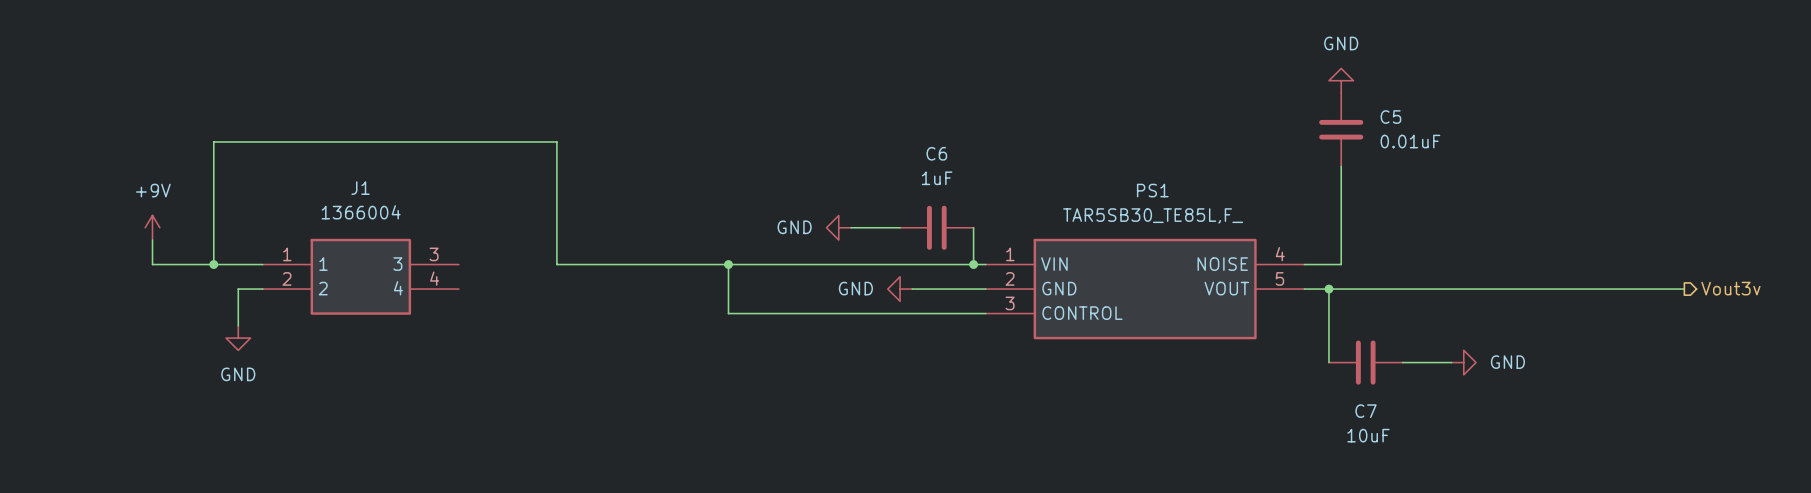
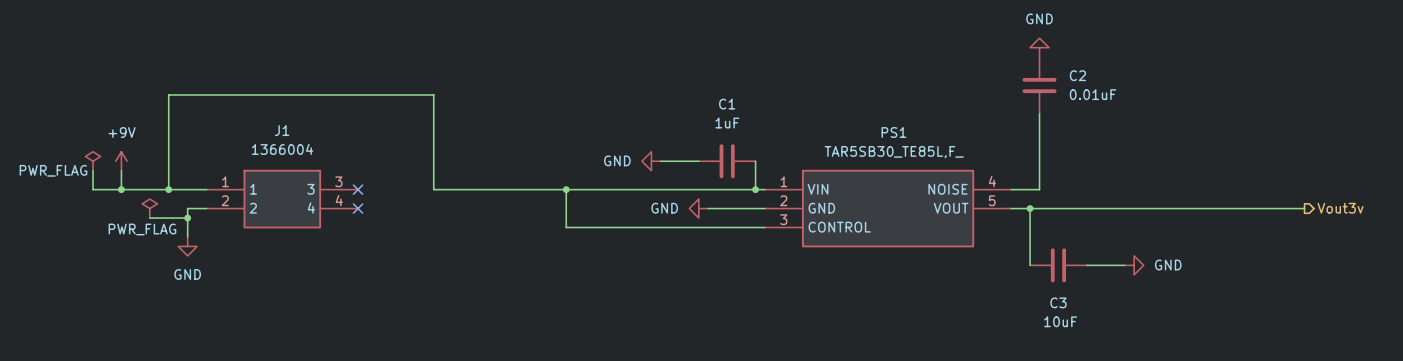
C5 name: C5 (1390, 117) -> C2 (1077, 75)
C6 name: C6 (936, 153) -> C1 (727, 104)
power symbol: none -> PWR_FLAG (93, 161)
wire: none -> (93, 170) (93, 189) (121, 189)
junction: none -> (121, 189)
no-connect mark: none -> (358, 189)
power symbol: none -> PWR_FLAG (149, 208)
no-connect mark: none -> (358, 208)
wire: none -> (149, 218) (187, 218)
junction: none -> (187, 218)
C7 name: C7 (1366, 411) -> C3 (1058, 302)

